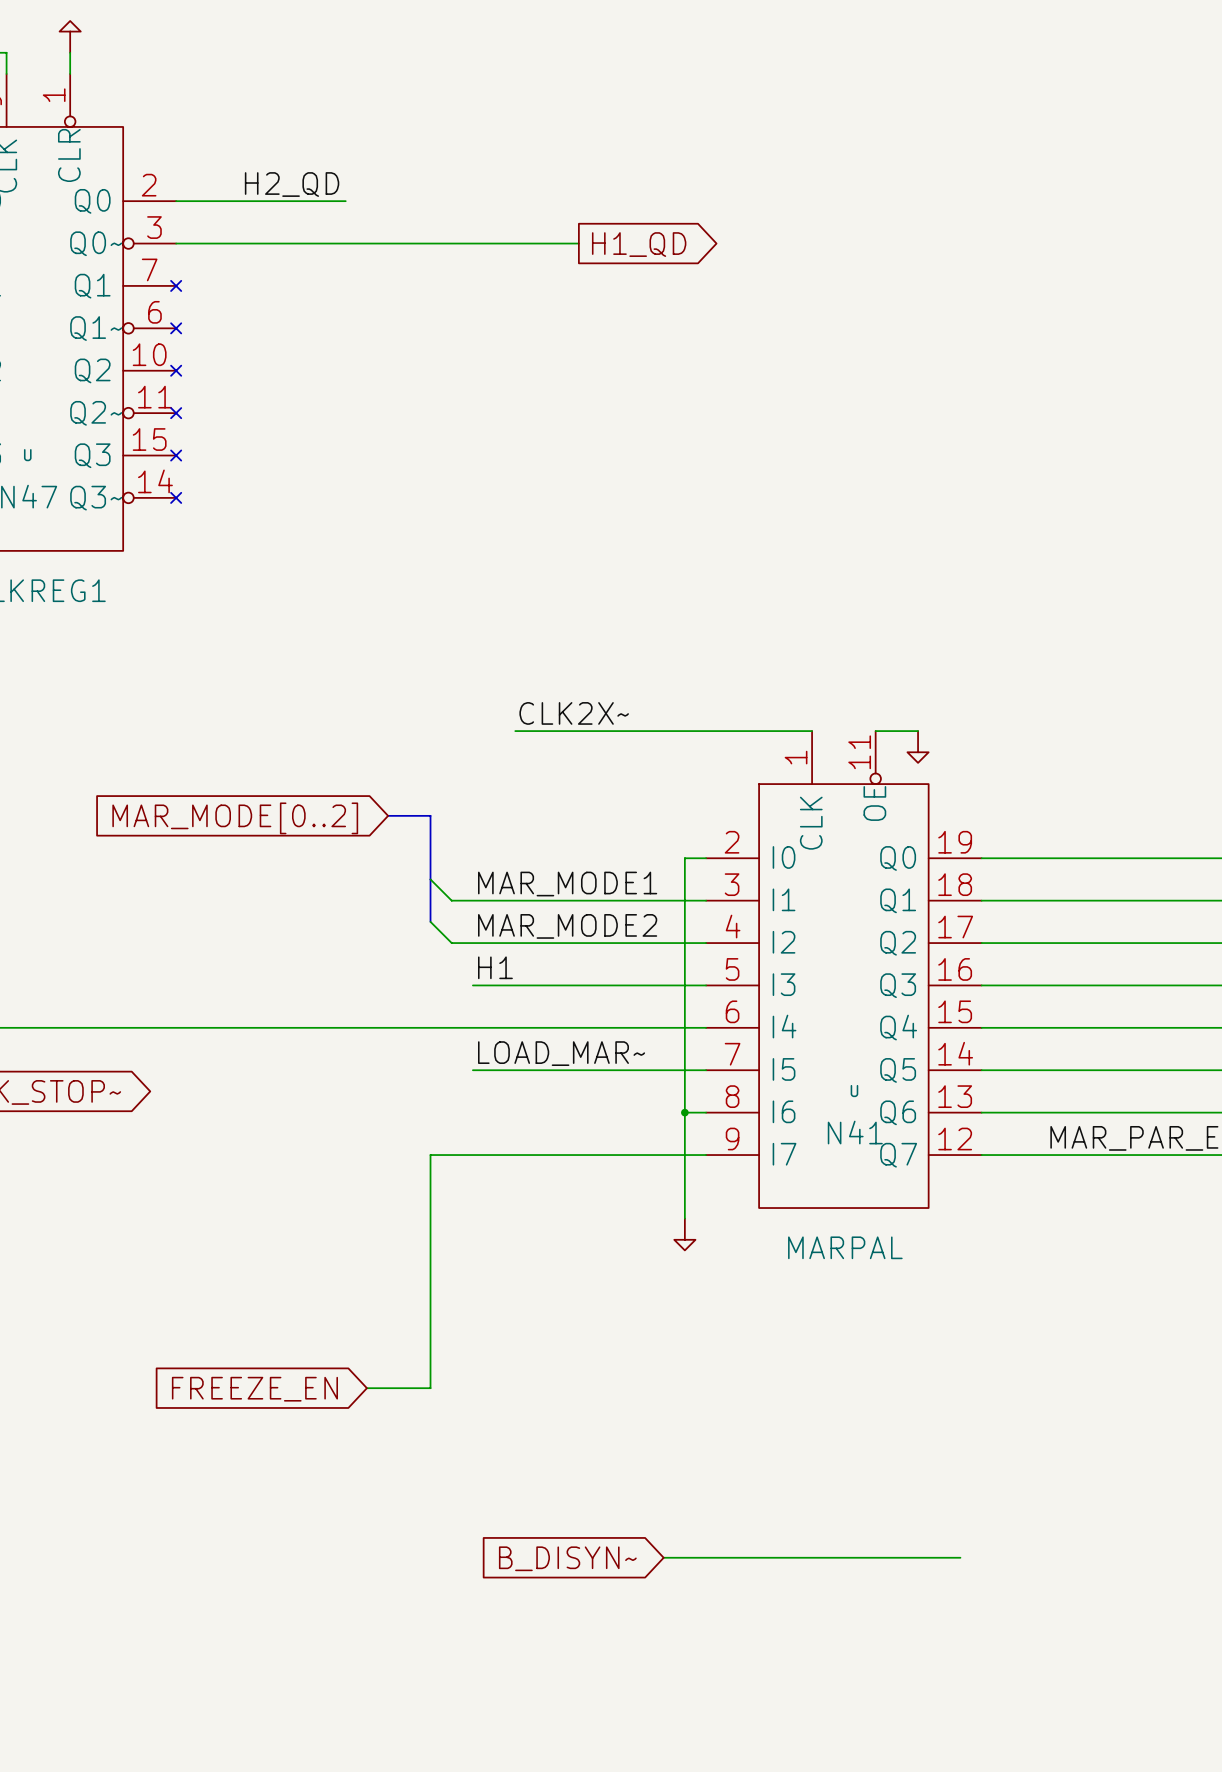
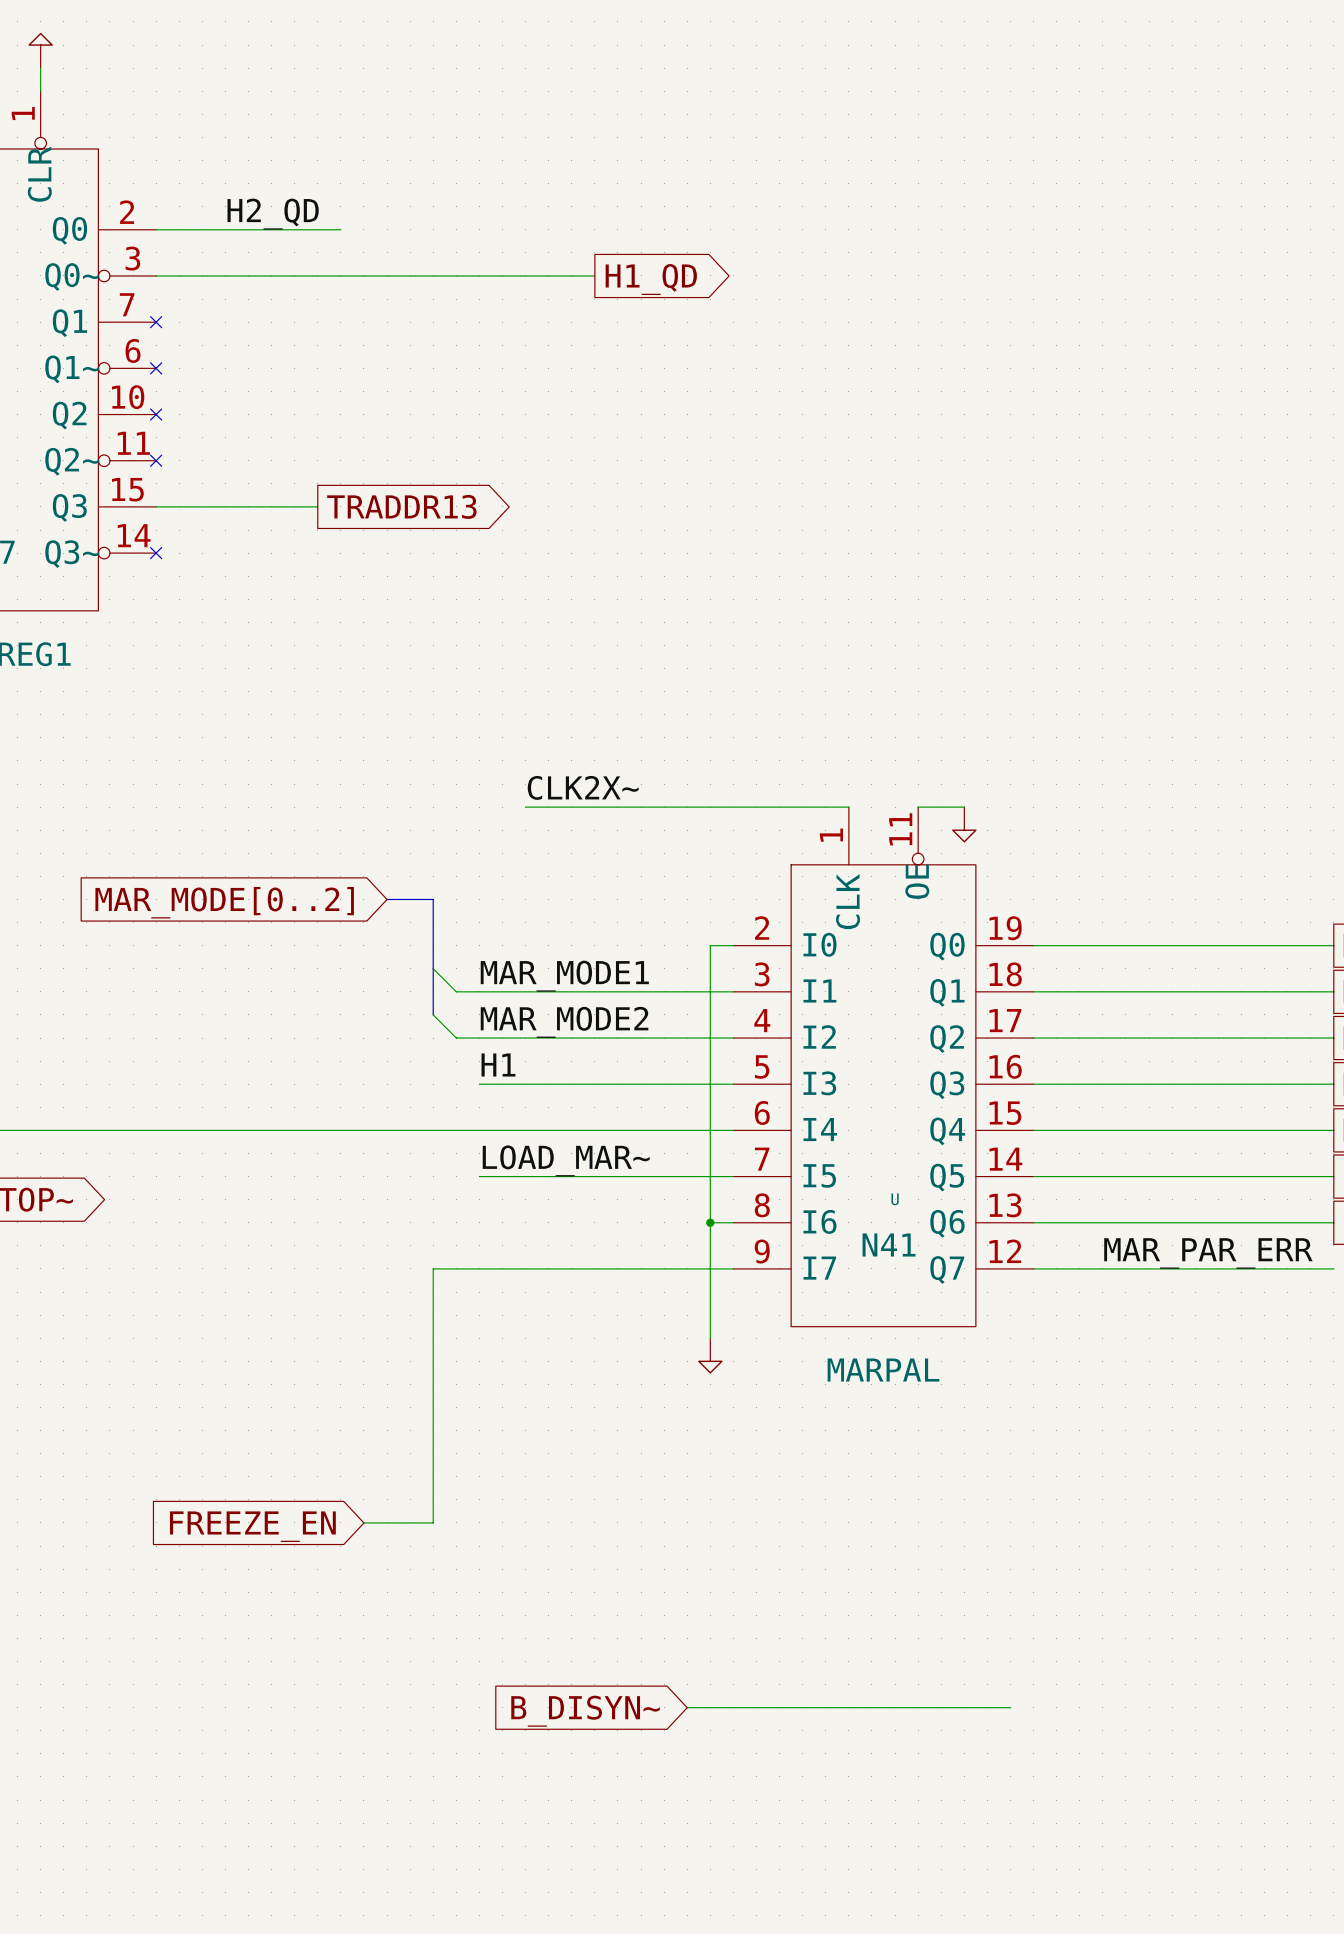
wire: none -> (156, 506) (317, 506)
no-connect mark: (176, 455) -> none
global label: none -> TRADDR13 (401, 506)

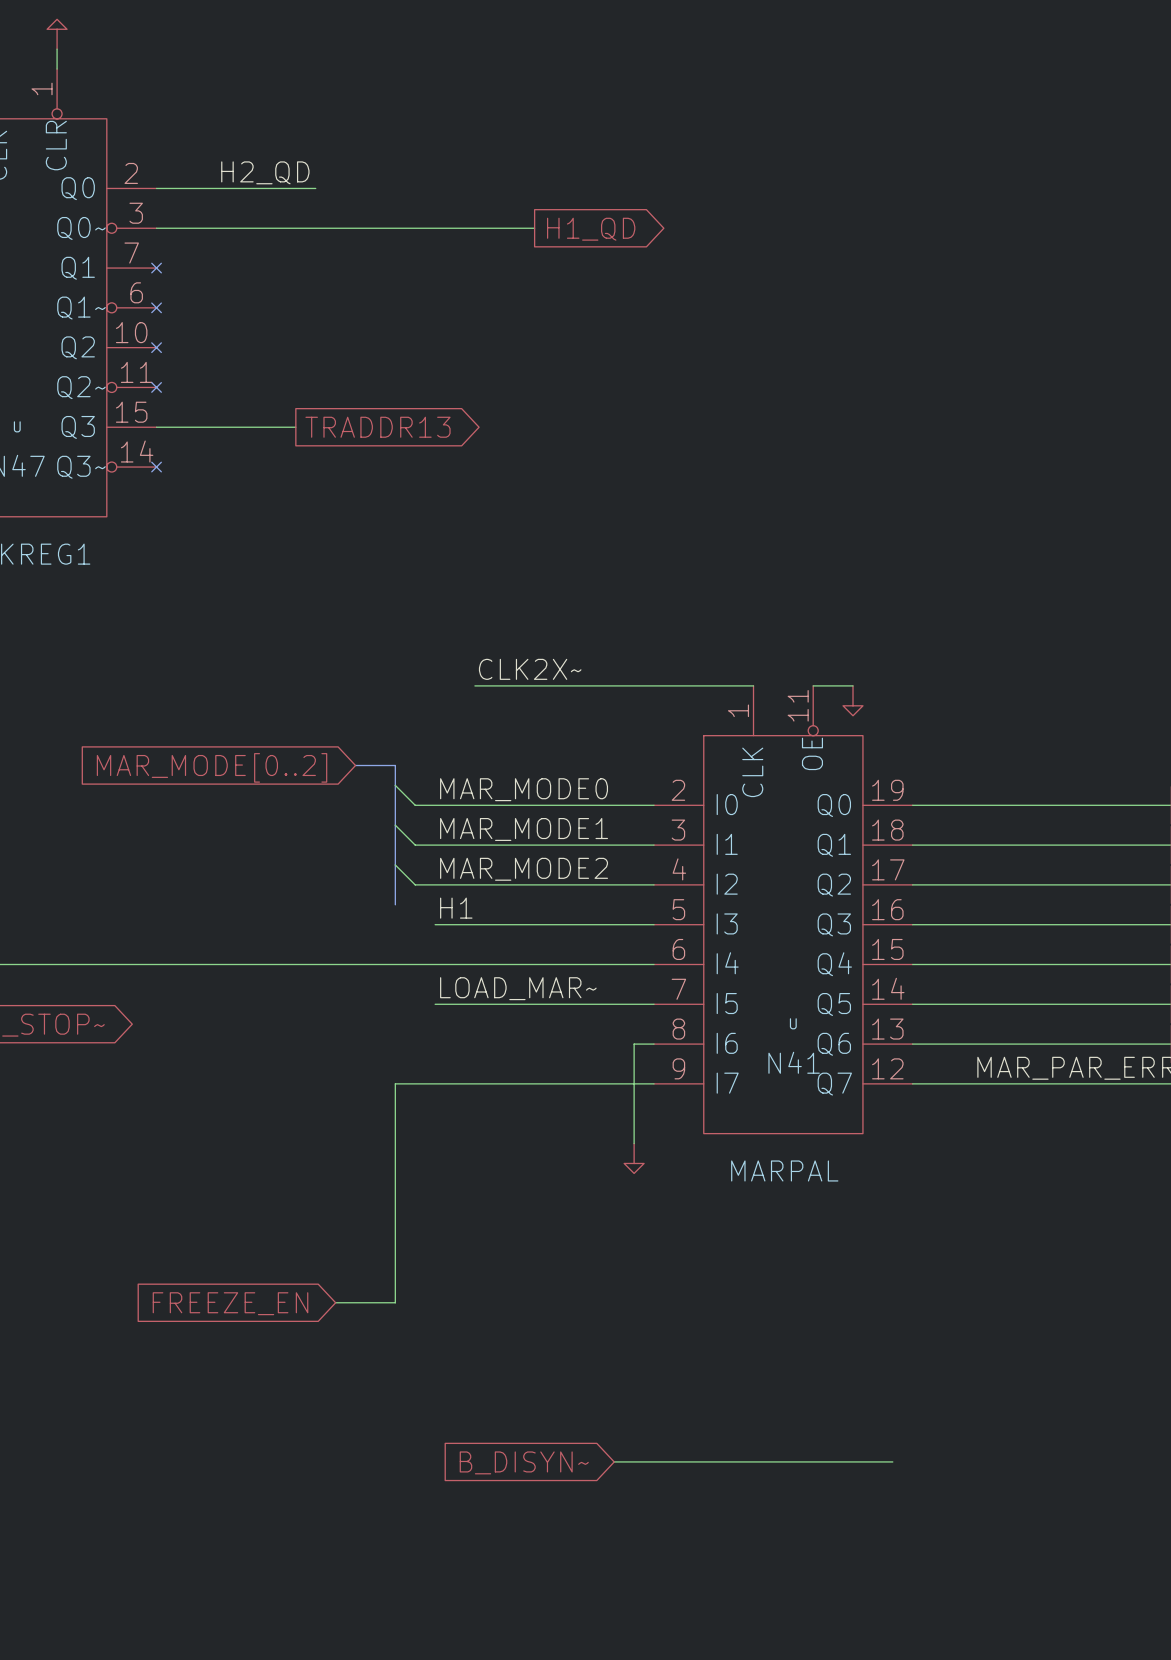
label: none -> MAR_MODE0 (524, 789)
wire: (710, 945) (710, 1222) -> (634, 805) (415, 805) (395, 785)
bus: none -> (395, 865) (395, 904)
junction: (710, 1222) -> none

